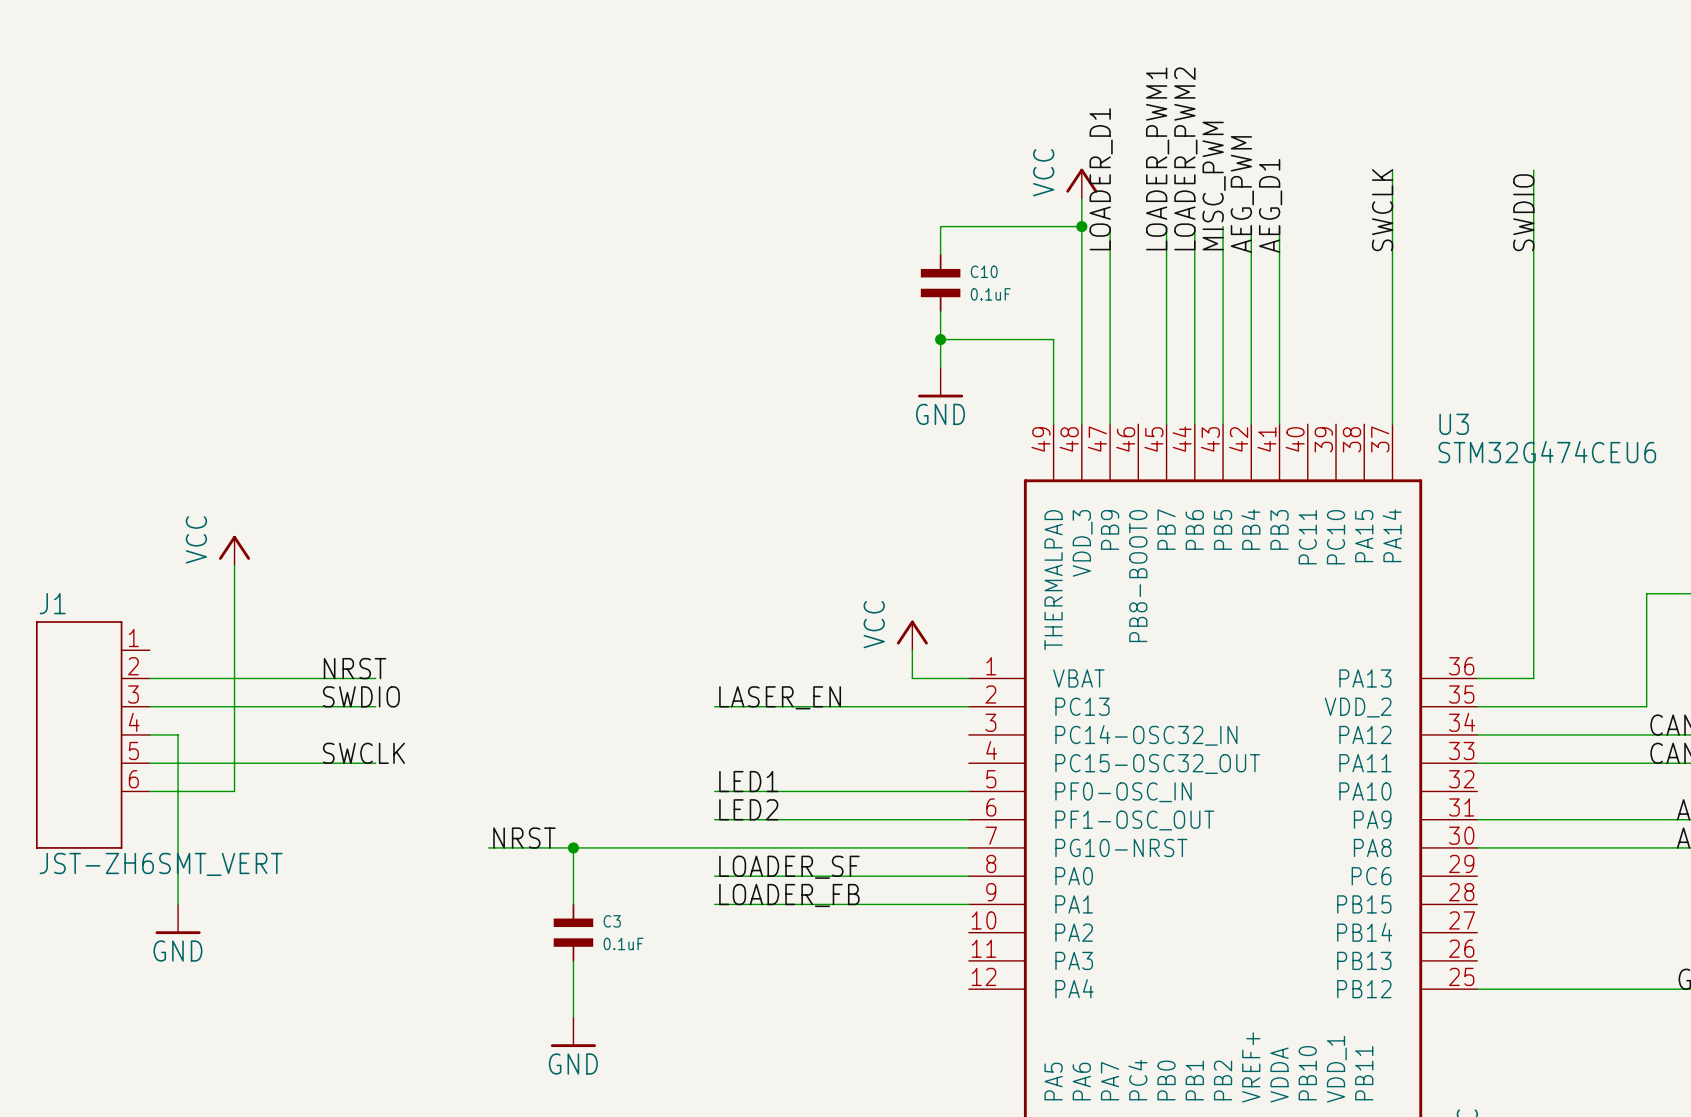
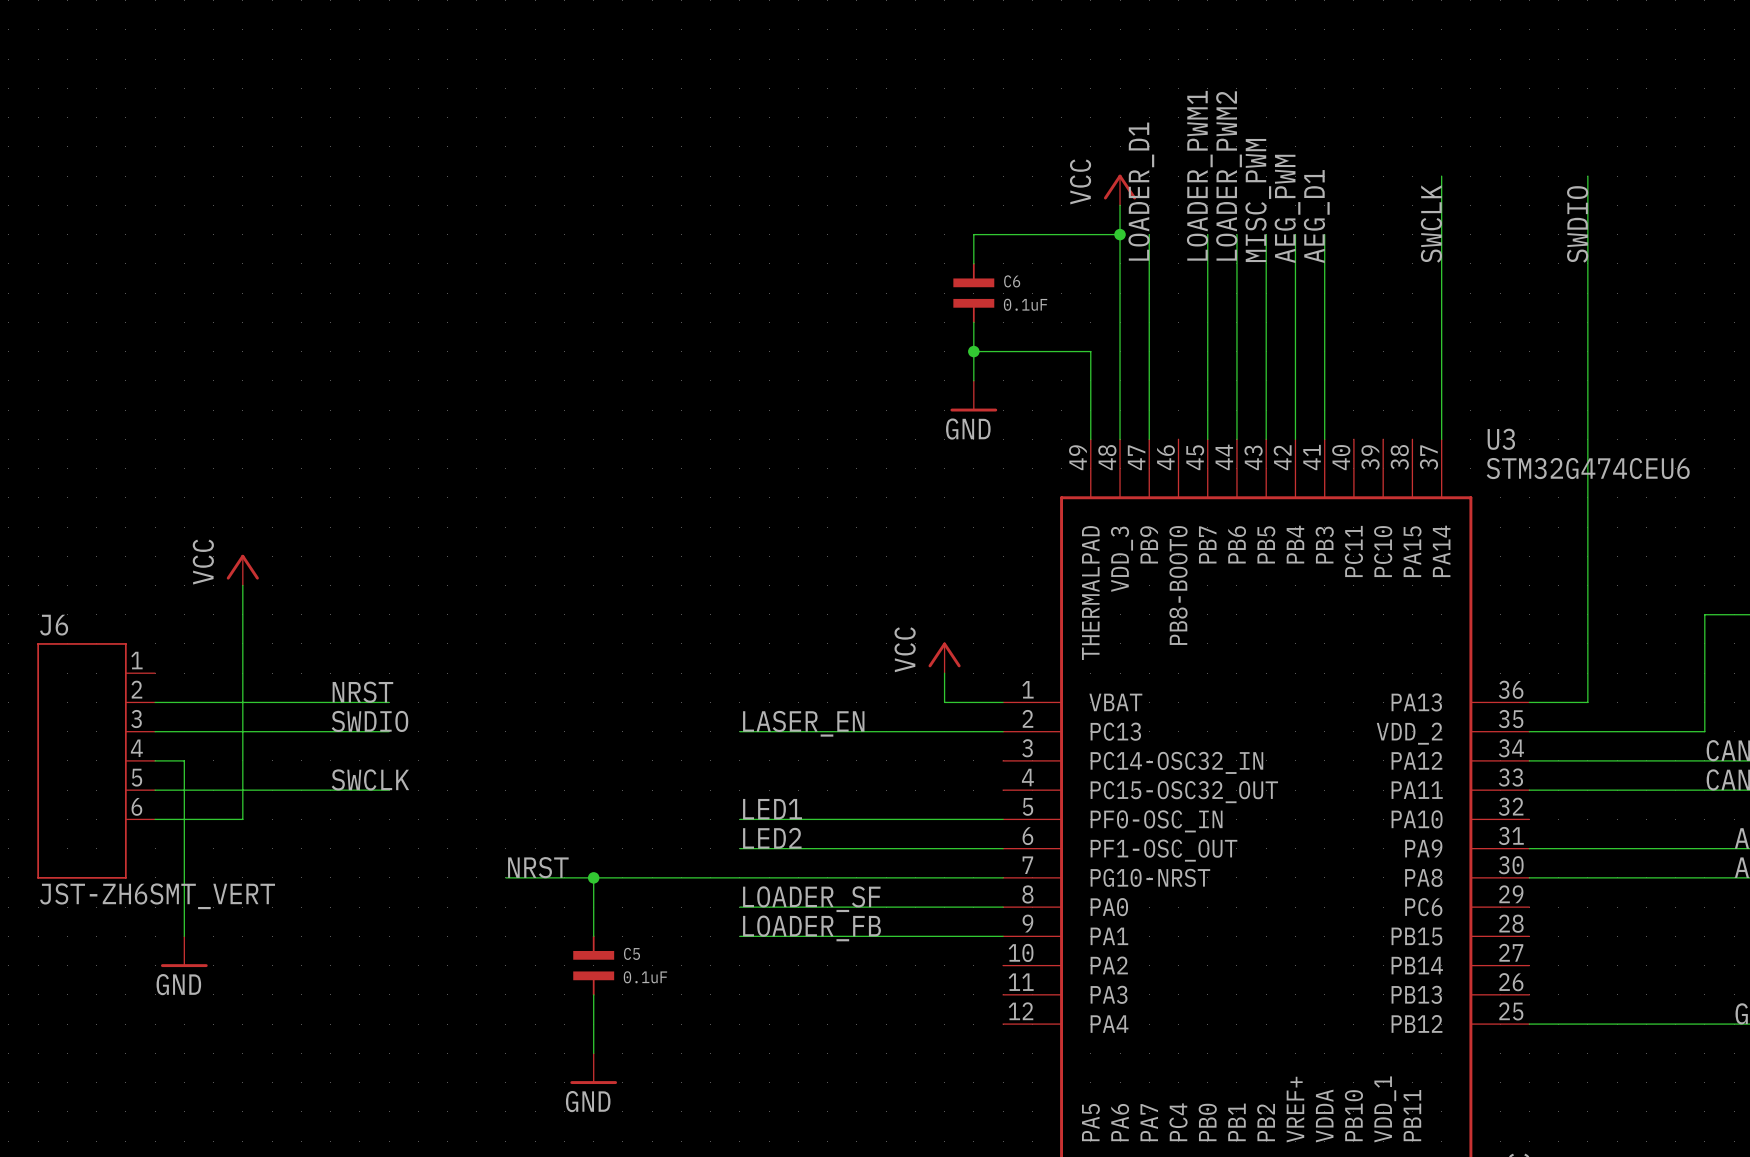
C10 name: C10 (984, 271) -> C6 (1012, 281)
J1 name: J1 (52, 603) -> J6 (54, 625)
C3 name: C3 (612, 921) -> C5 (632, 953)

